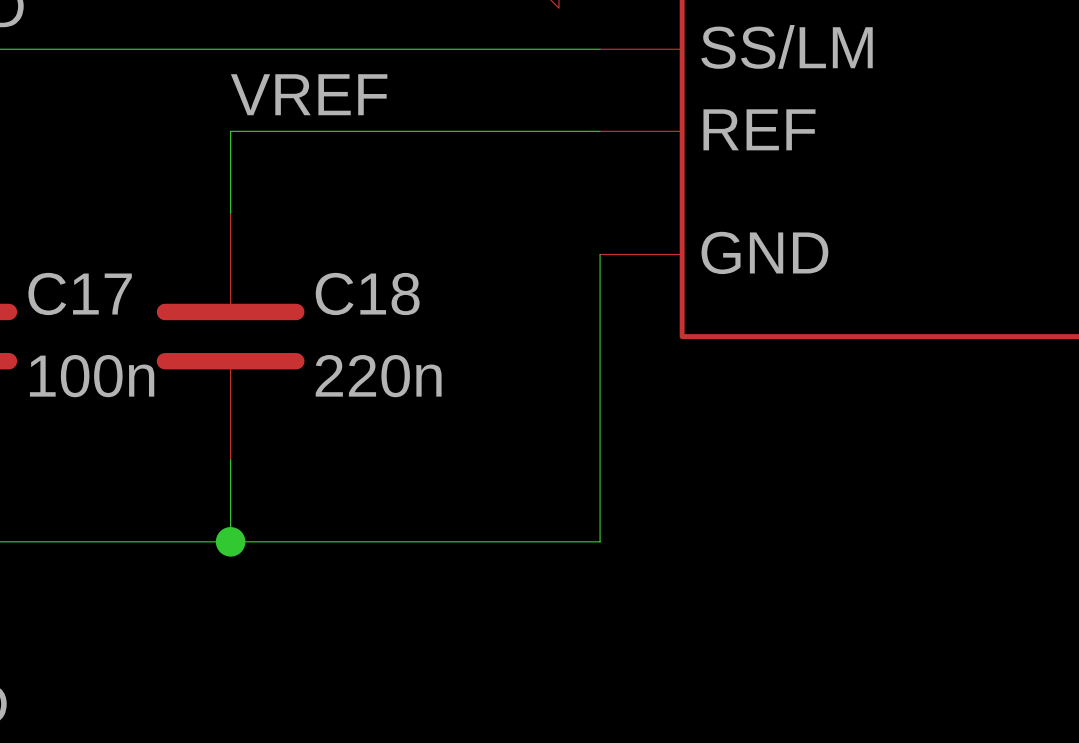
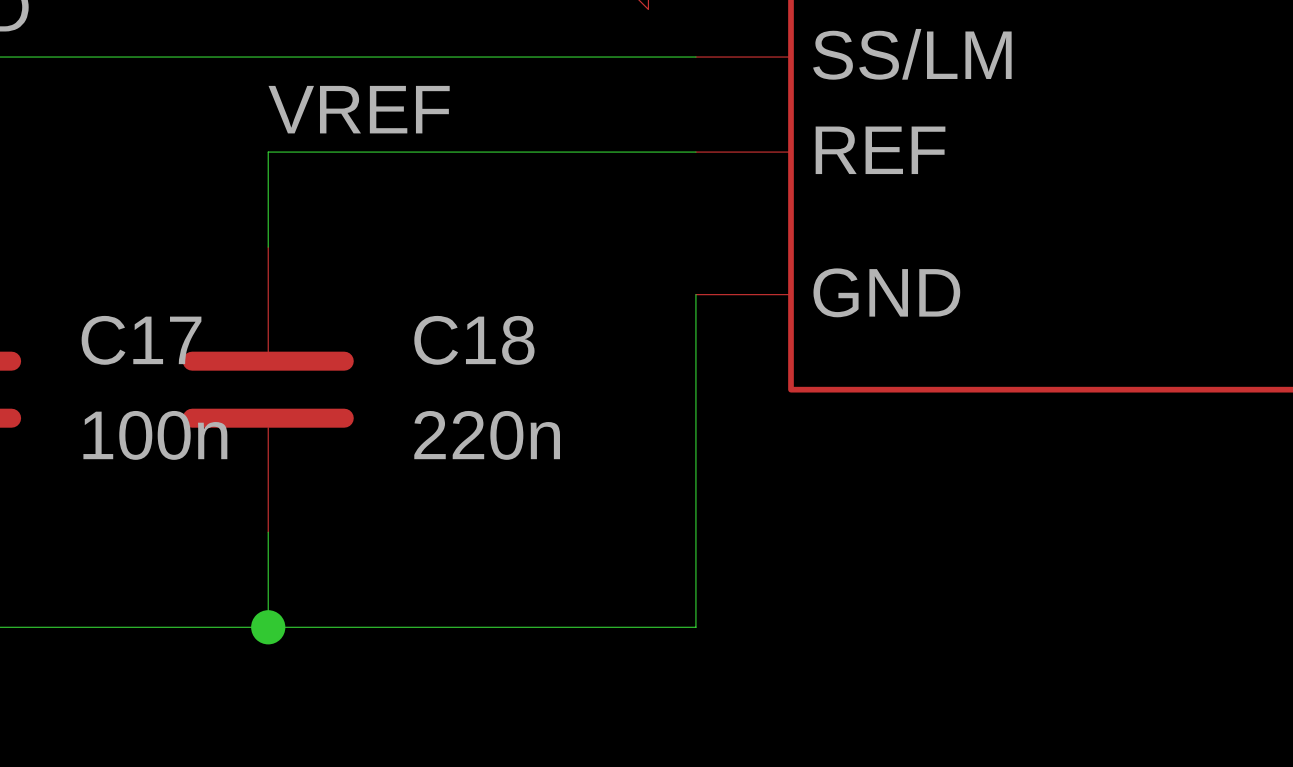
C17 name position: C17 (80, 294) -> C17 (141, 340)
C18 name position: C18 (367, 294) -> C18 (474, 340)
C17 value position: 100n (92, 376) -> 100n (155, 435)
C18 value position: 220n (378, 376) -> 220n (487, 435)

